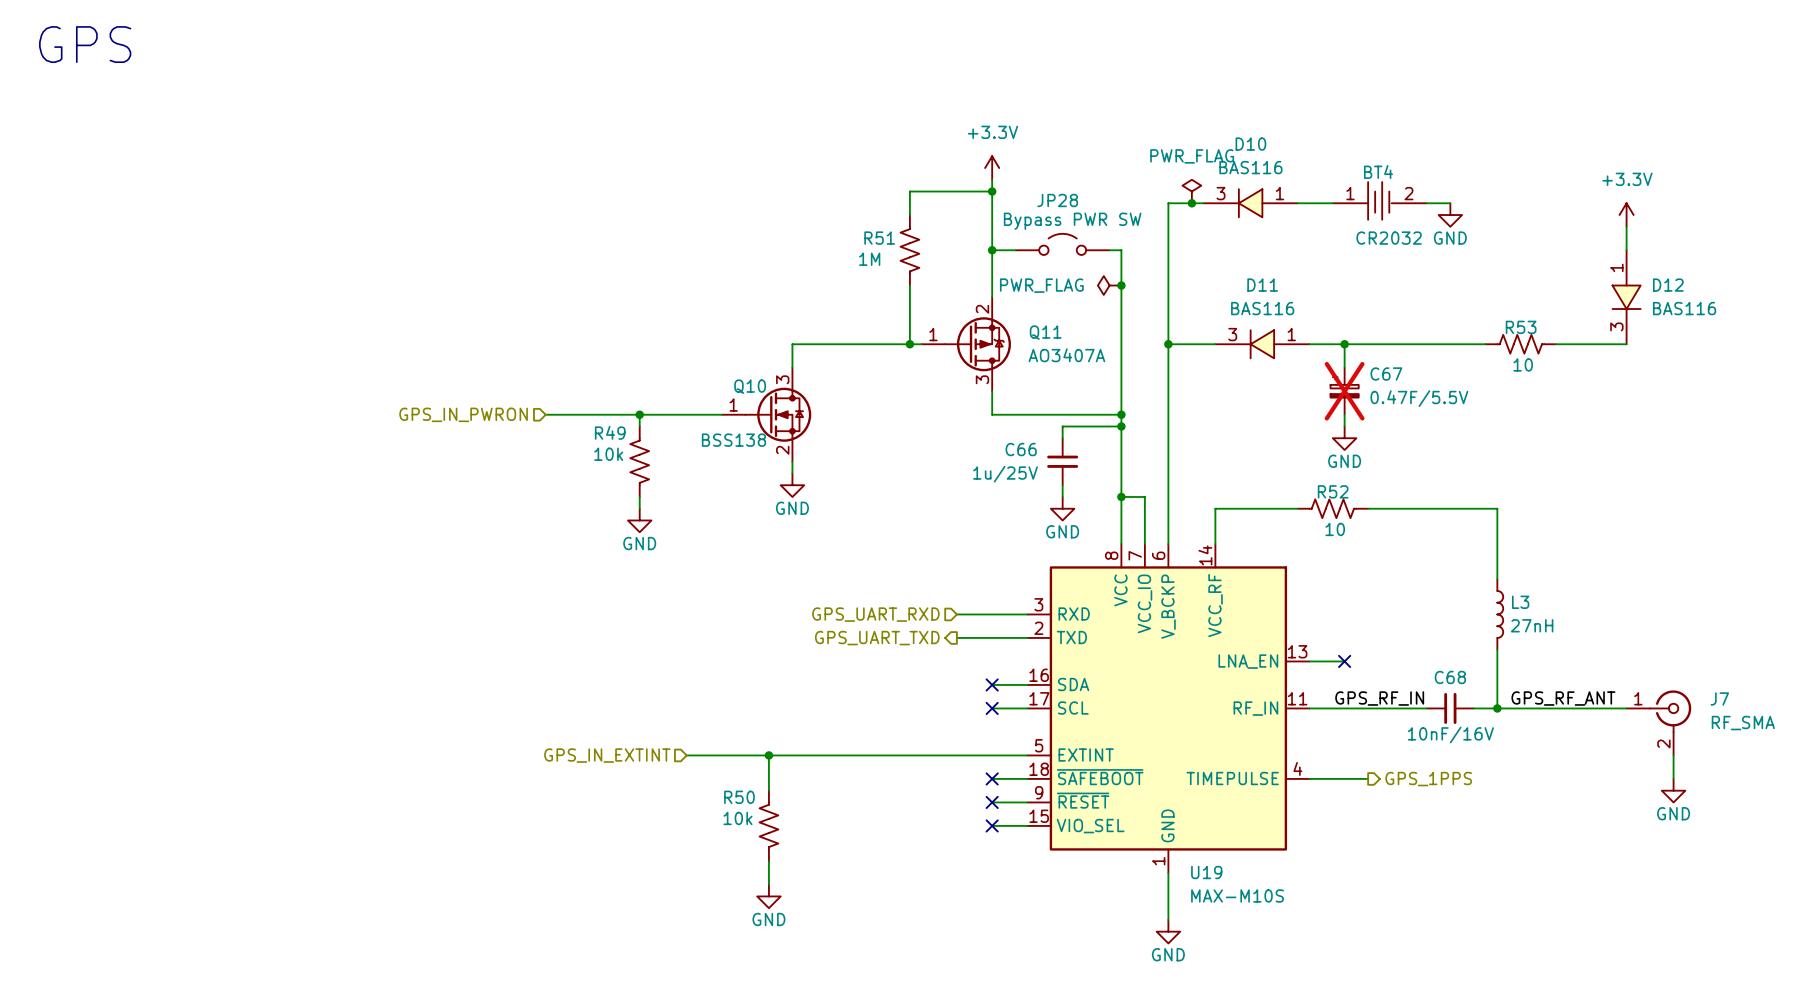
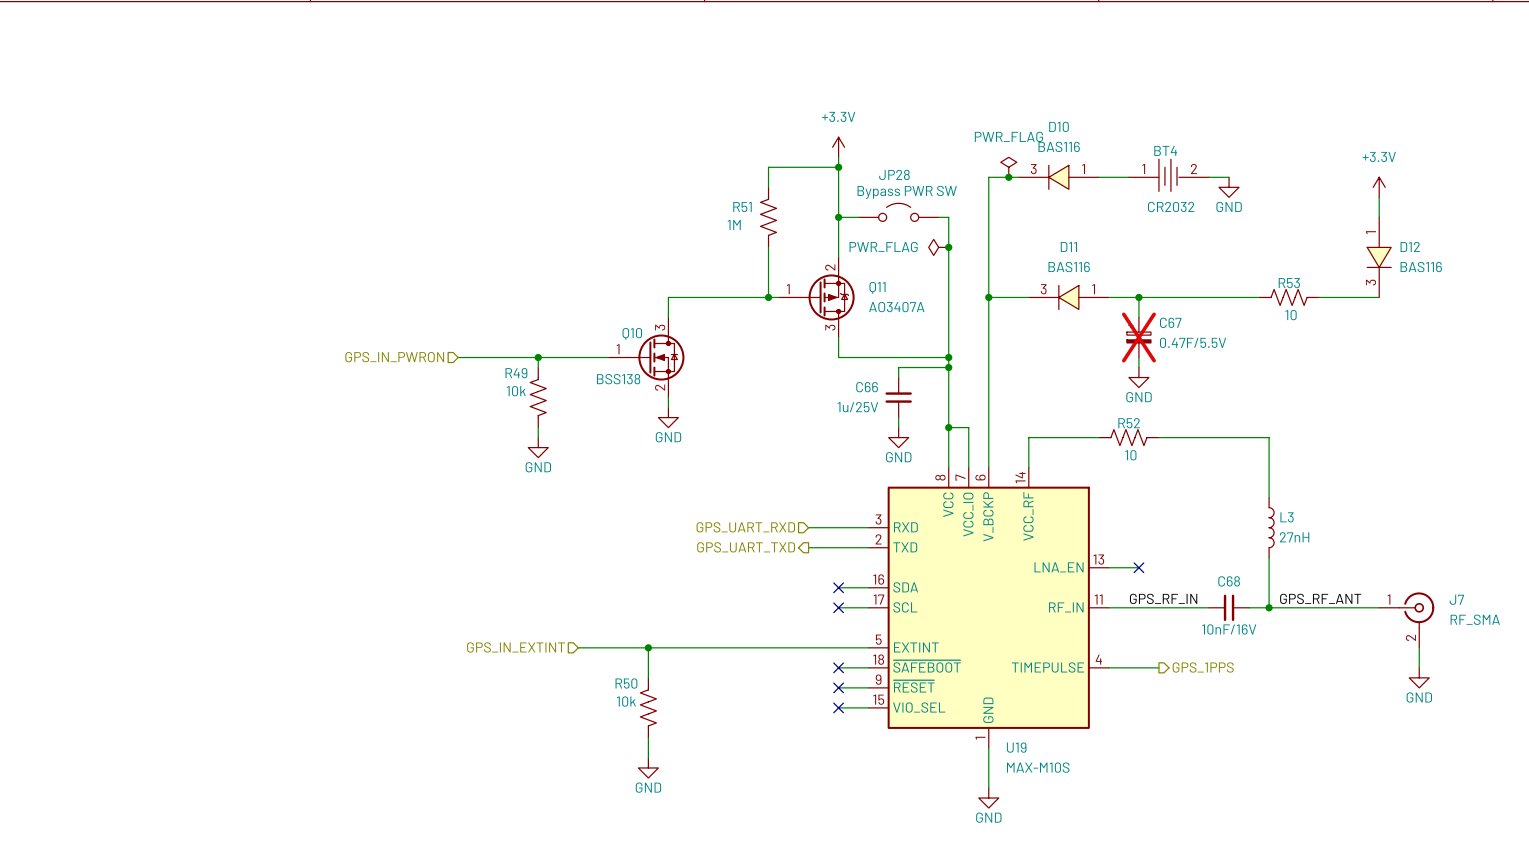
text: GPS (85, 44) -> none

